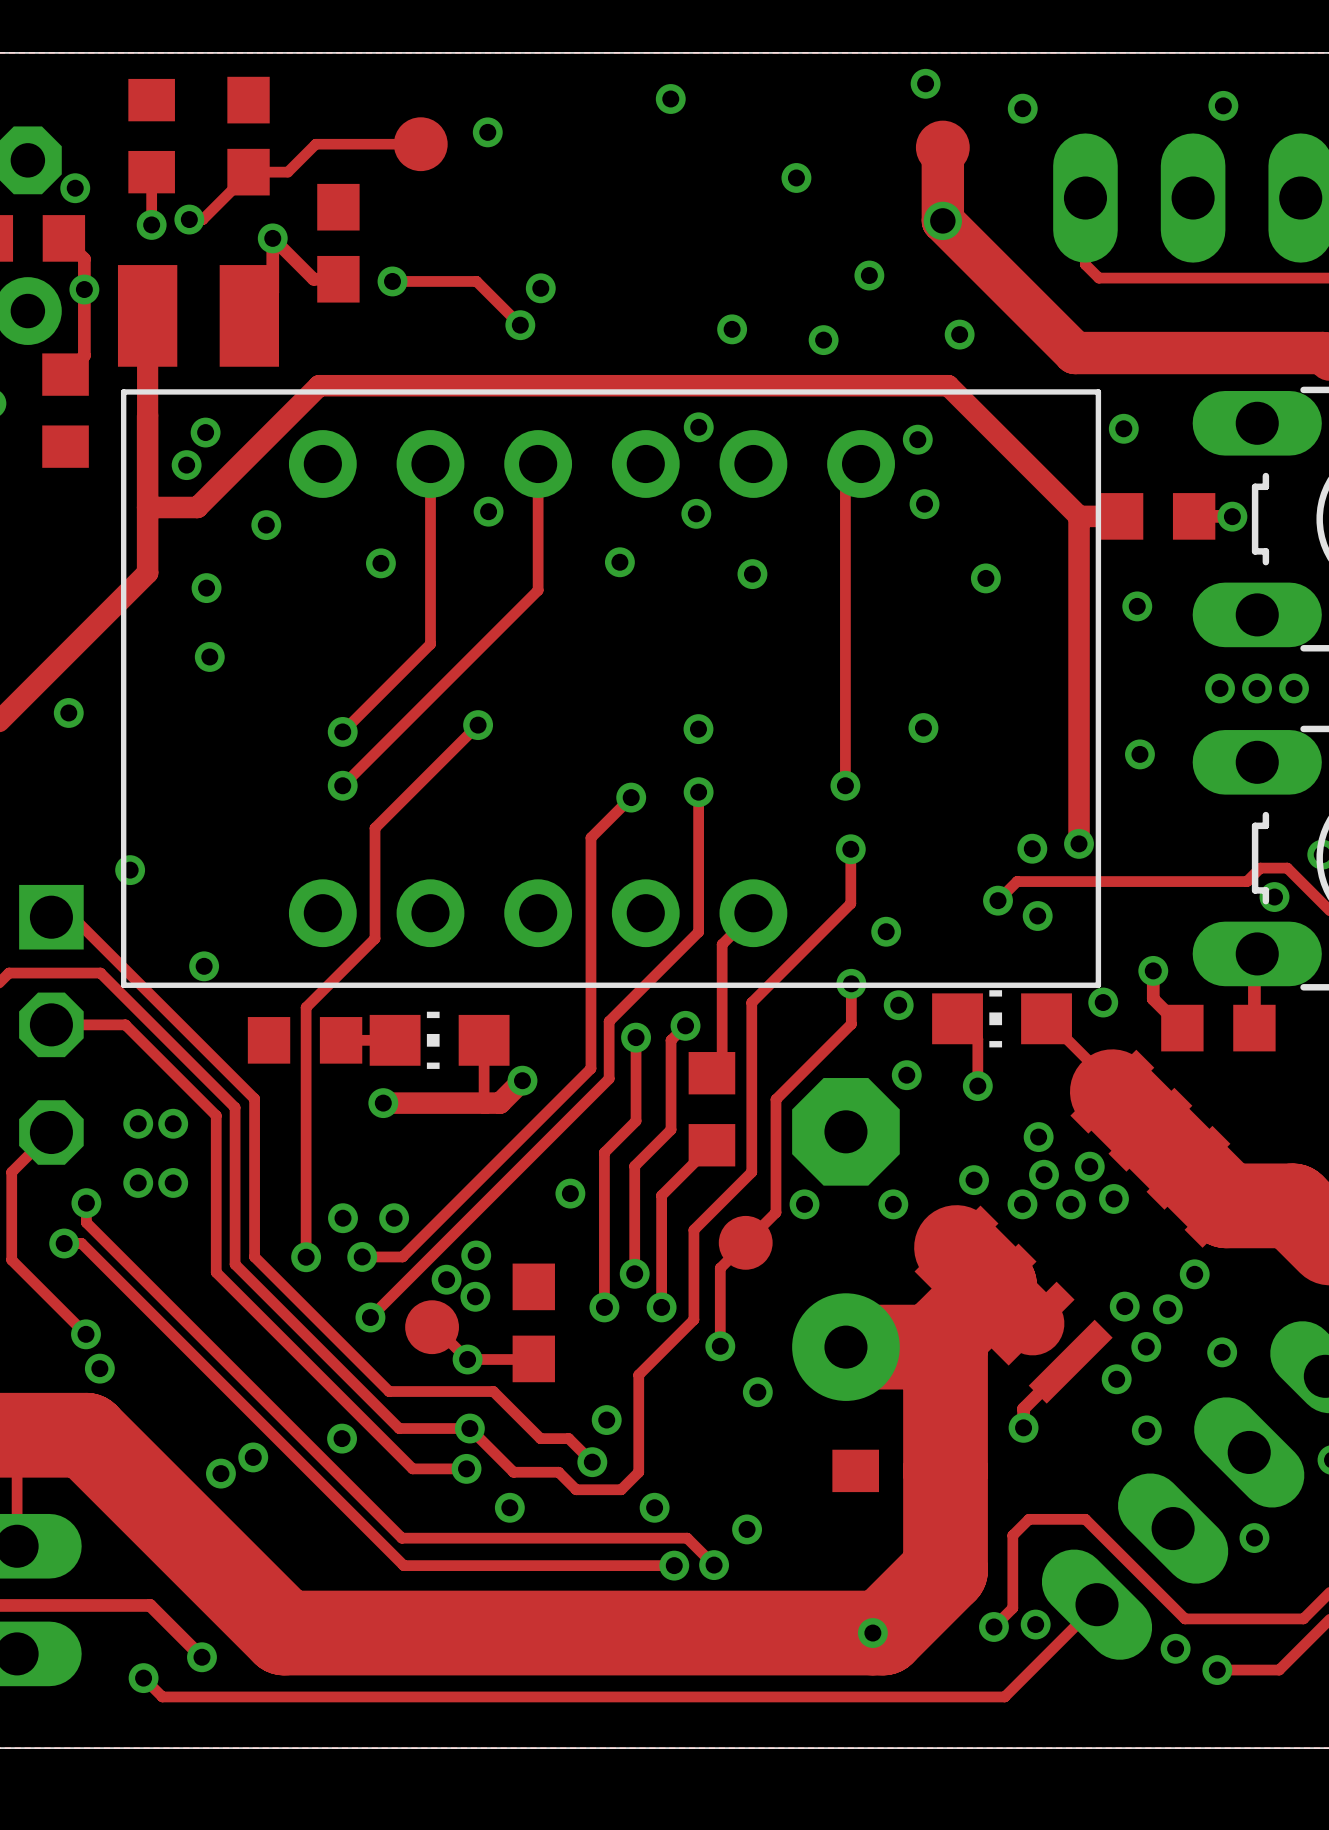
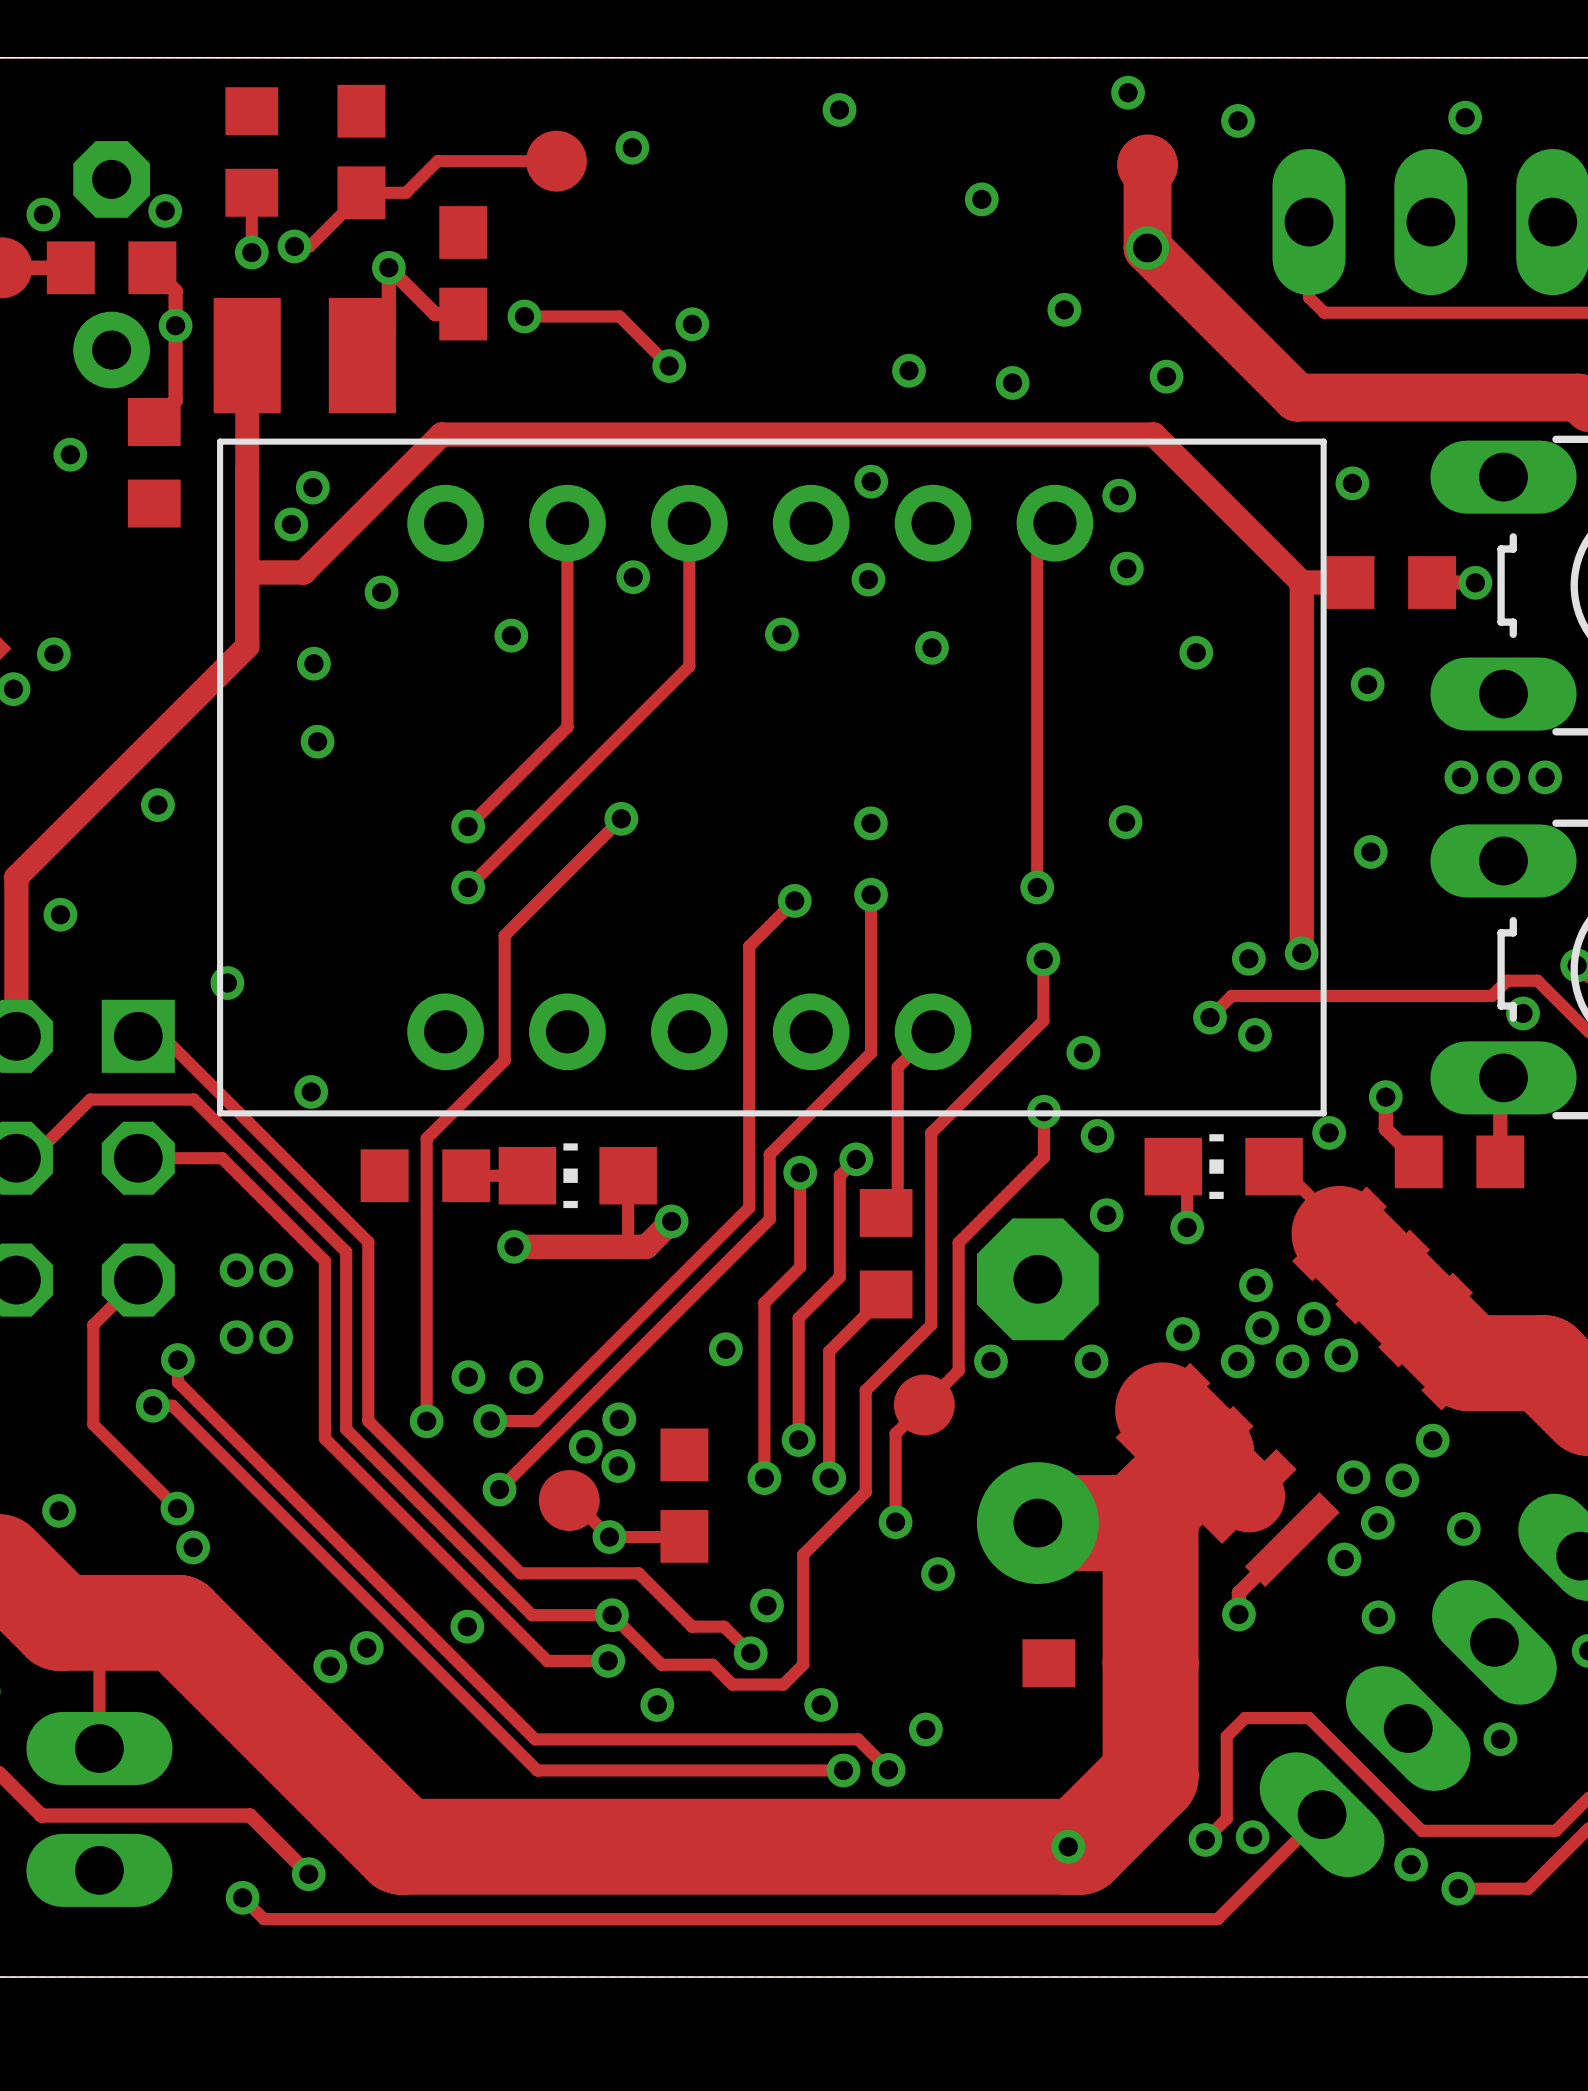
part position: (1002, 1018) -> (1223, 1166)

